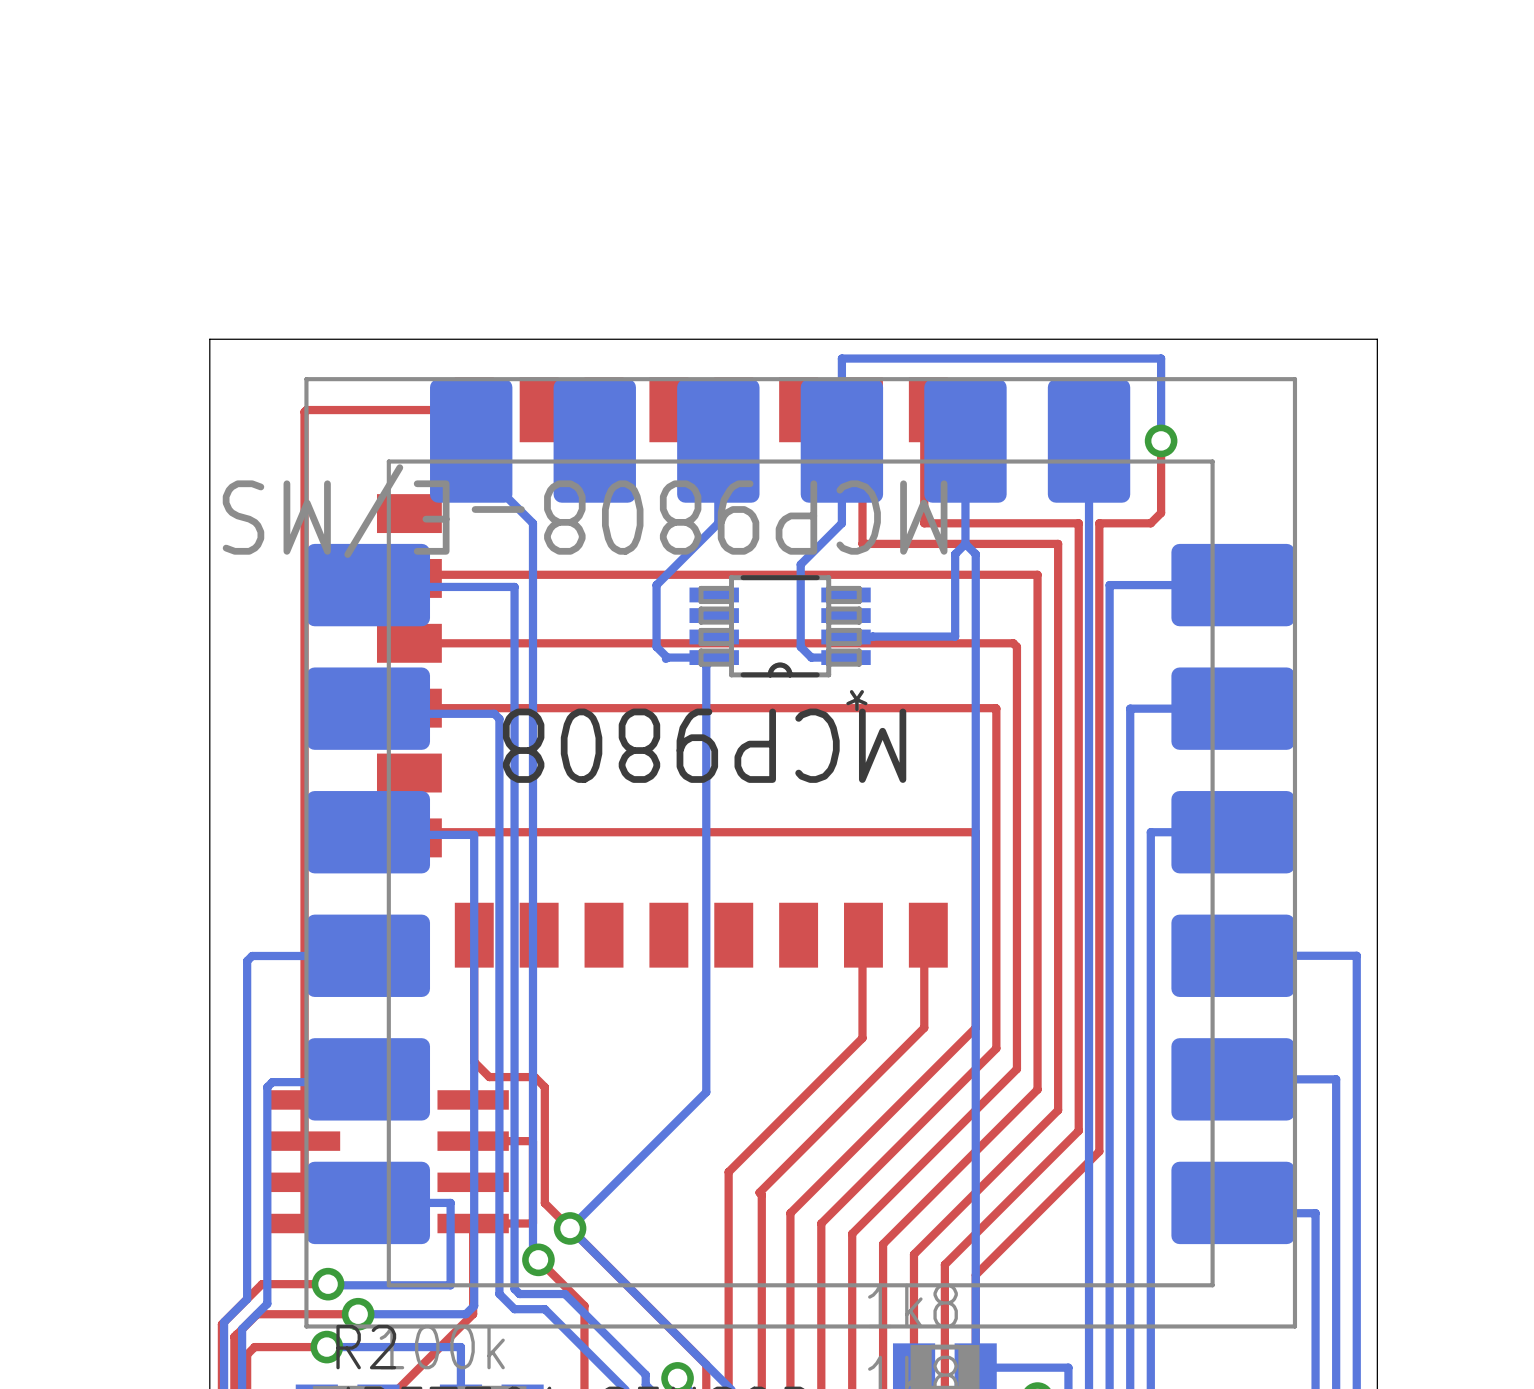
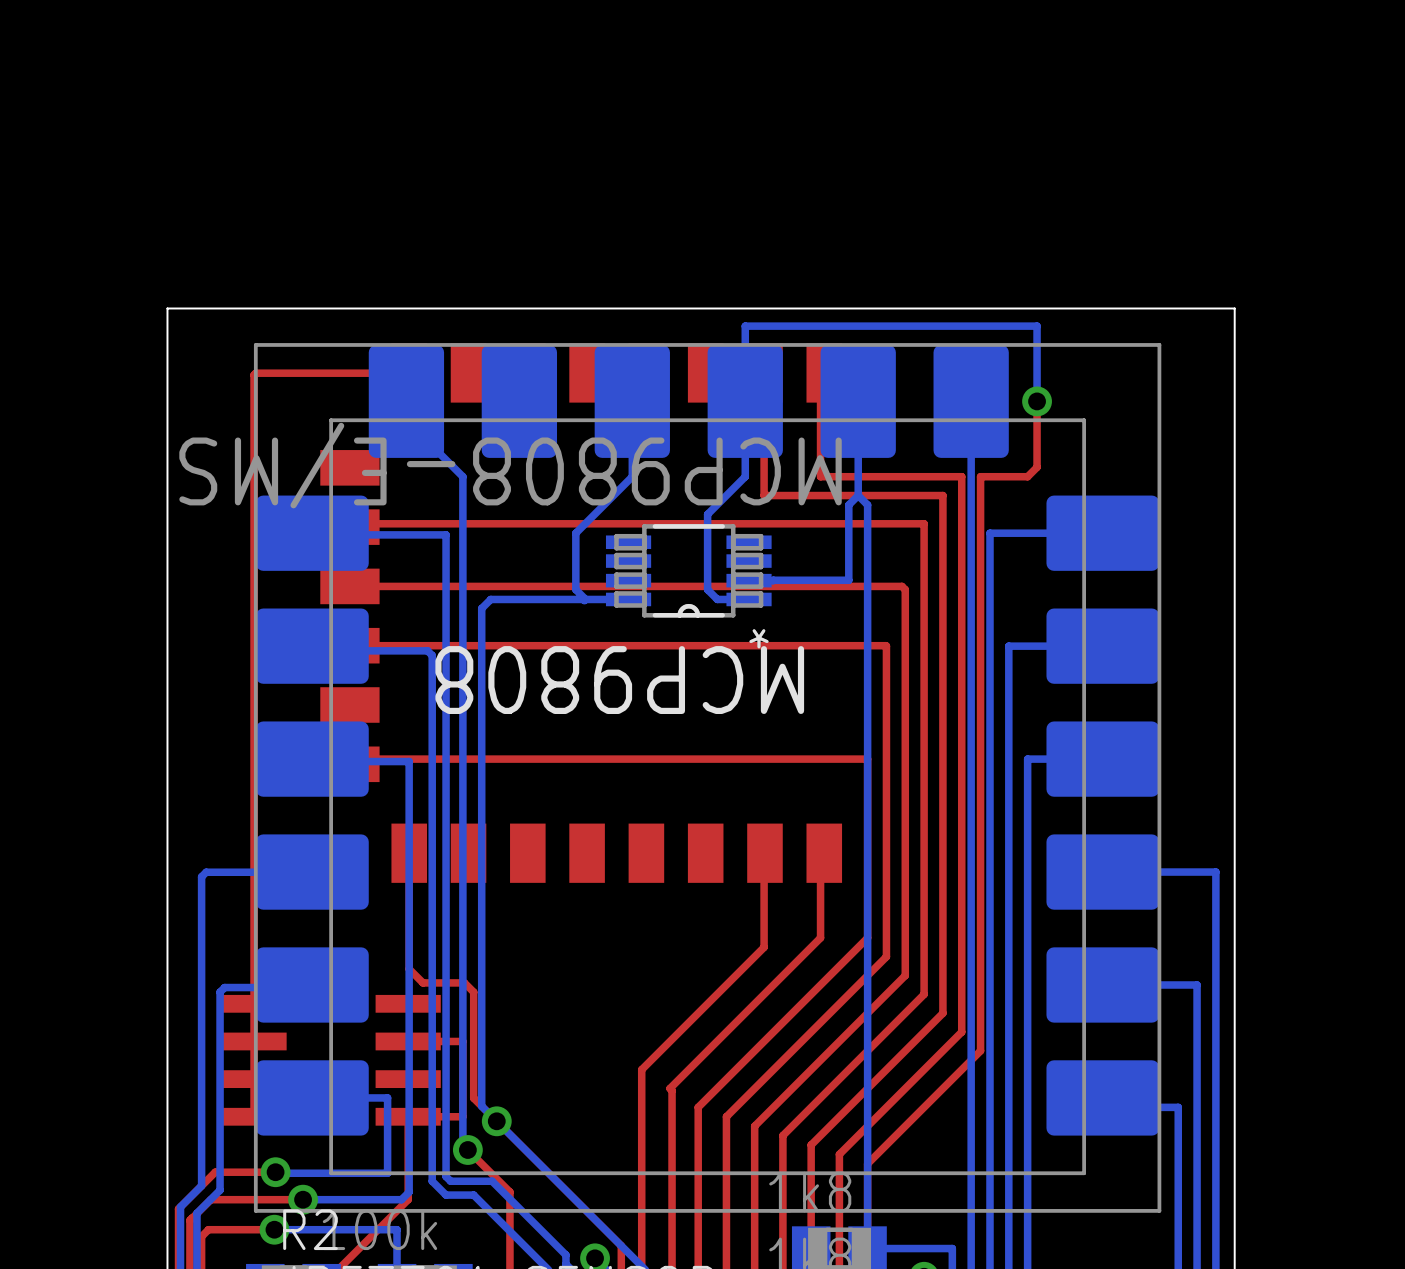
bottom track: (714, 657) (706, 665) (706, 1092) (570, 1228) -> (585, 599) (490, 599) (481, 608) (481, 1106) (496, 1121)

